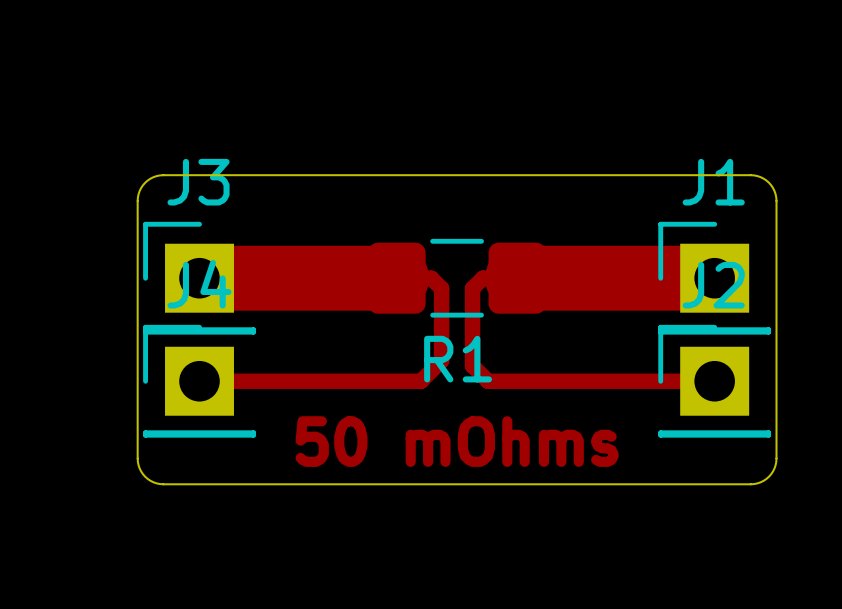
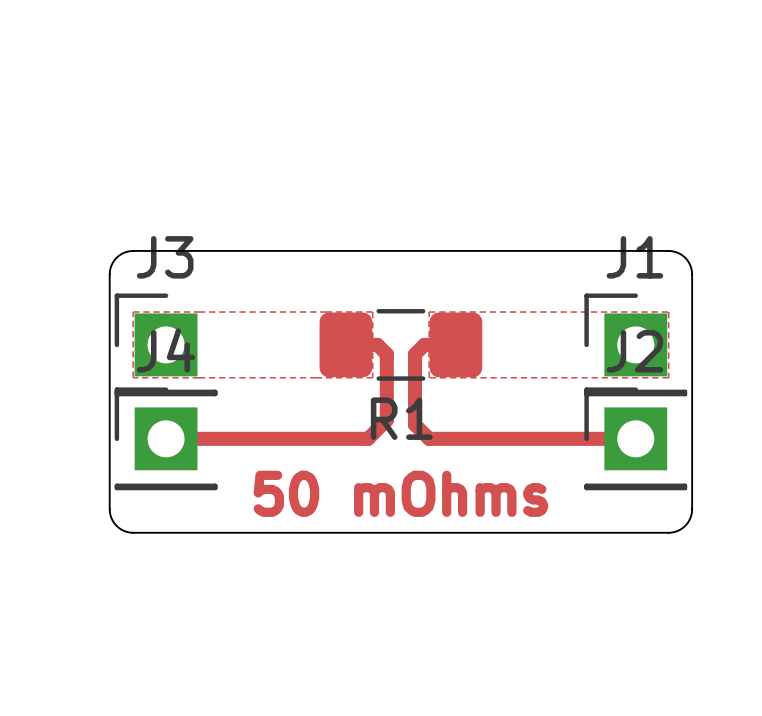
top zone outline: none -> (133, 312) (133, 377) (372, 377) (372, 312) (133, 312)
top zone outline: none -> (429, 312) (668, 312) (668, 377) (429, 377) (429, 312)
top track: (199, 278) (396, 278) -> none
top track: (517, 278) (714, 278) -> none

